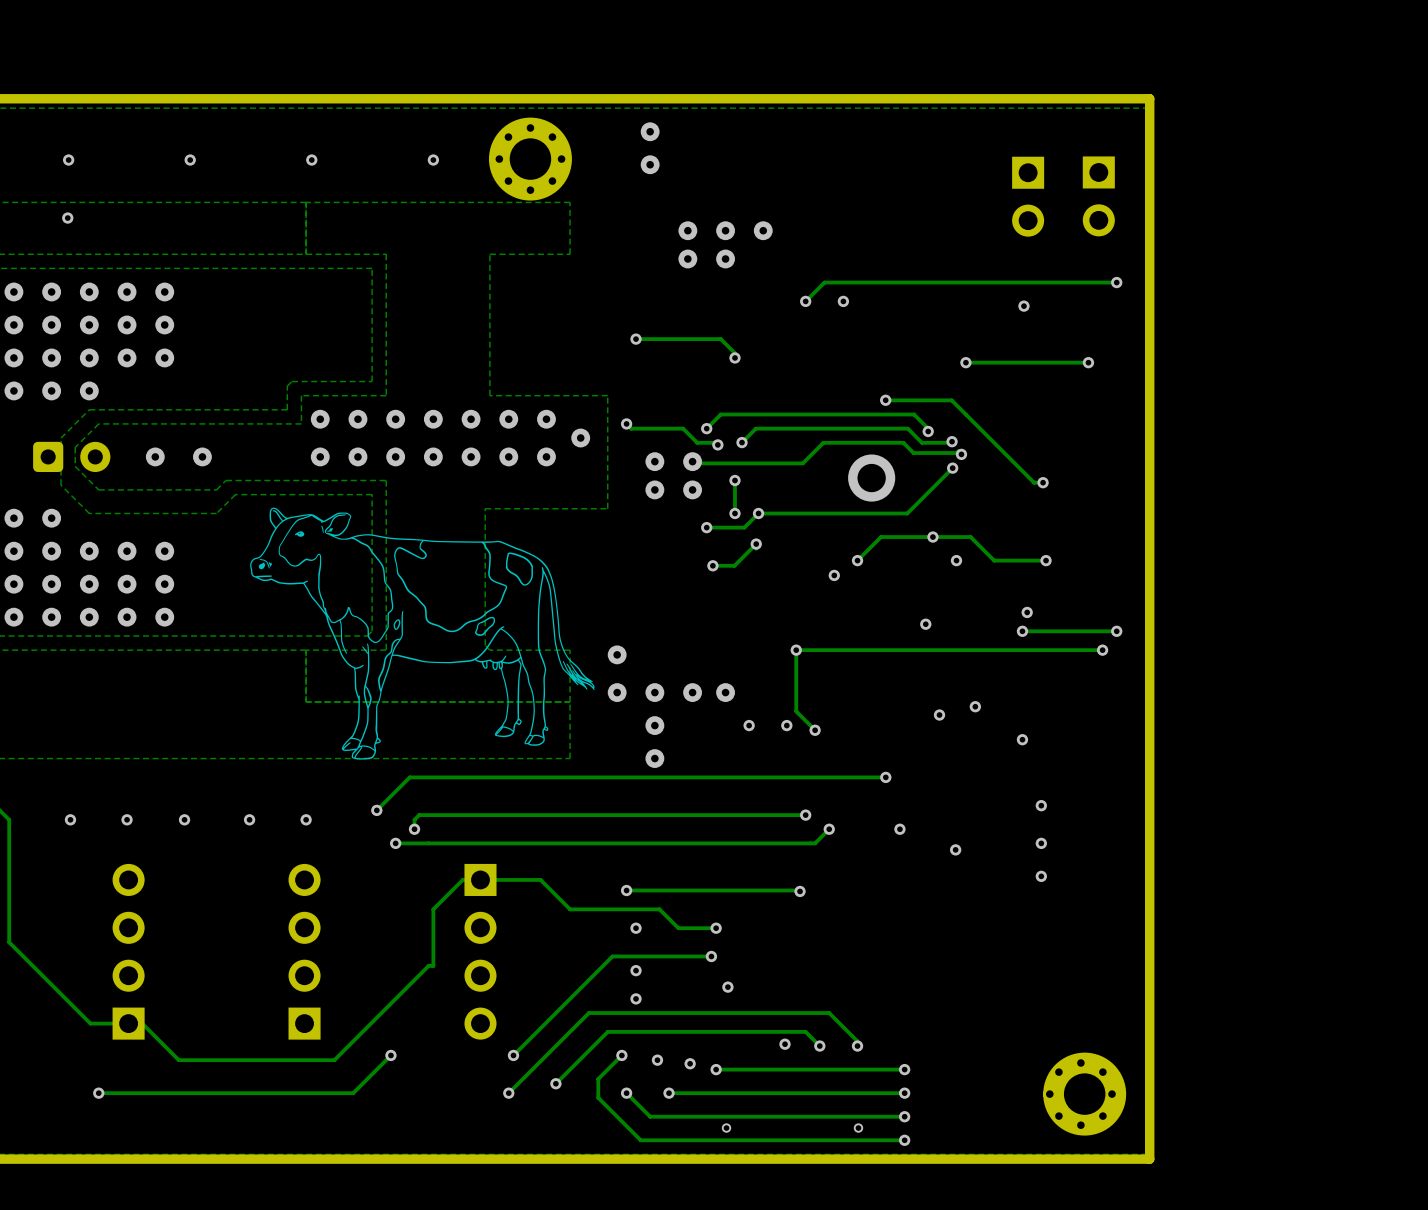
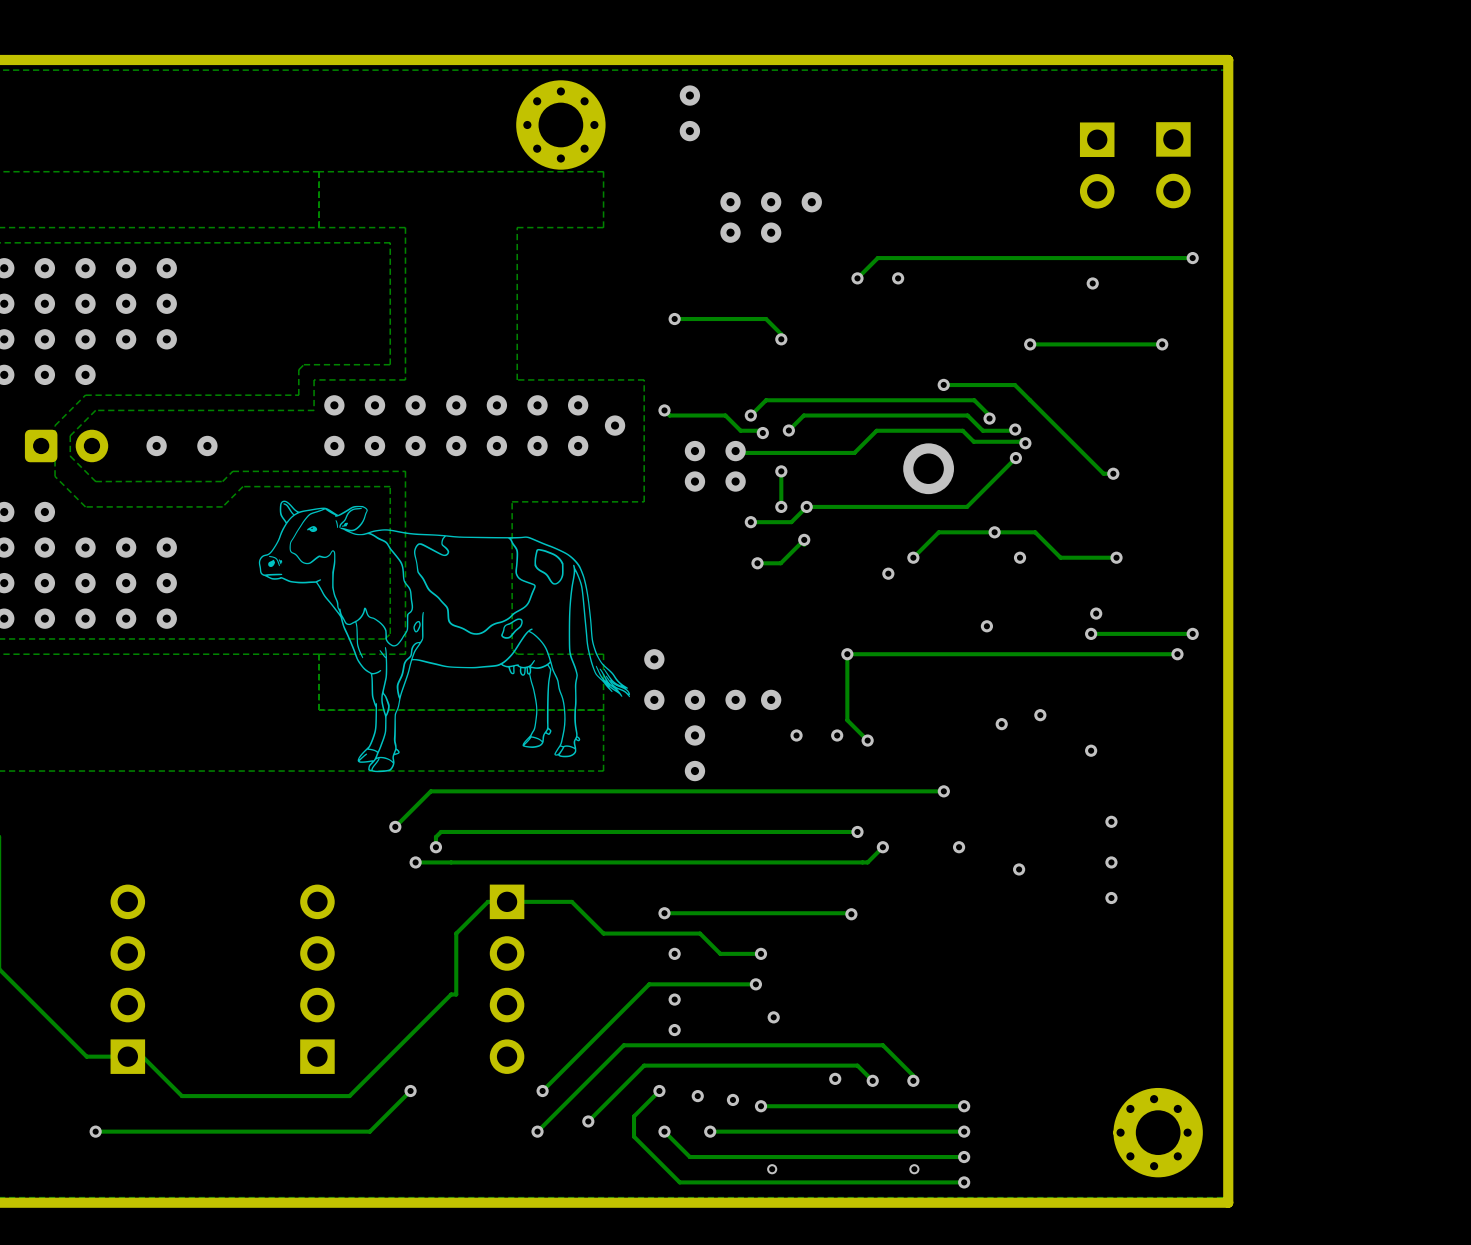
via: (68, 160) -> none
via: (190, 160) -> none
via: (311, 160) -> none
via: (433, 160) -> none
via: (67, 218) -> none
via: (70, 819) -> none
via: (127, 819) -> none
via: (184, 819) -> none
via: (249, 819) -> none
via: (306, 819) -> none

